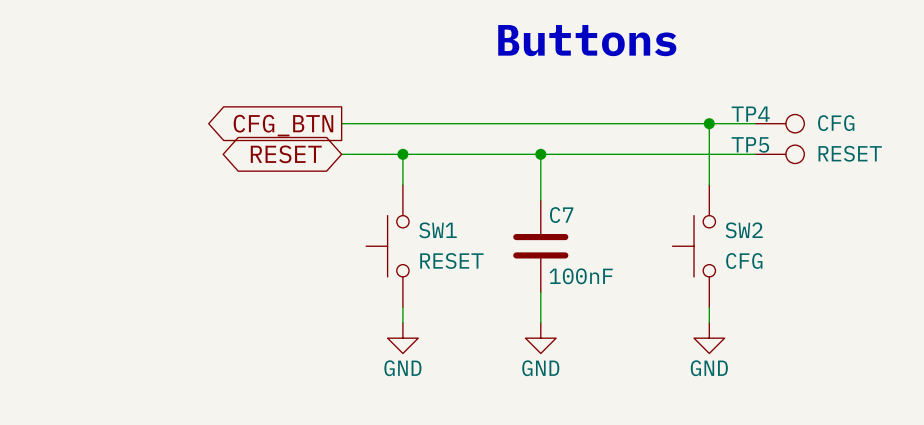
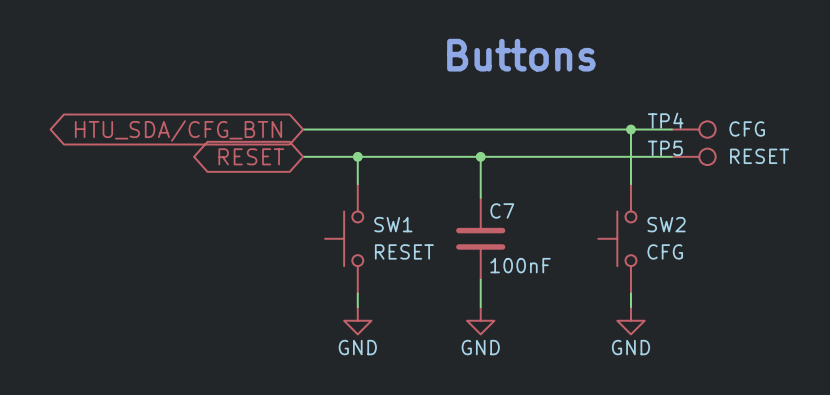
global label shape: output (283, 125) -> bidirectional (178, 130)
global label: CFG_BTN (283, 125) -> HTU_SDA/CFG_BTN (178, 130)

